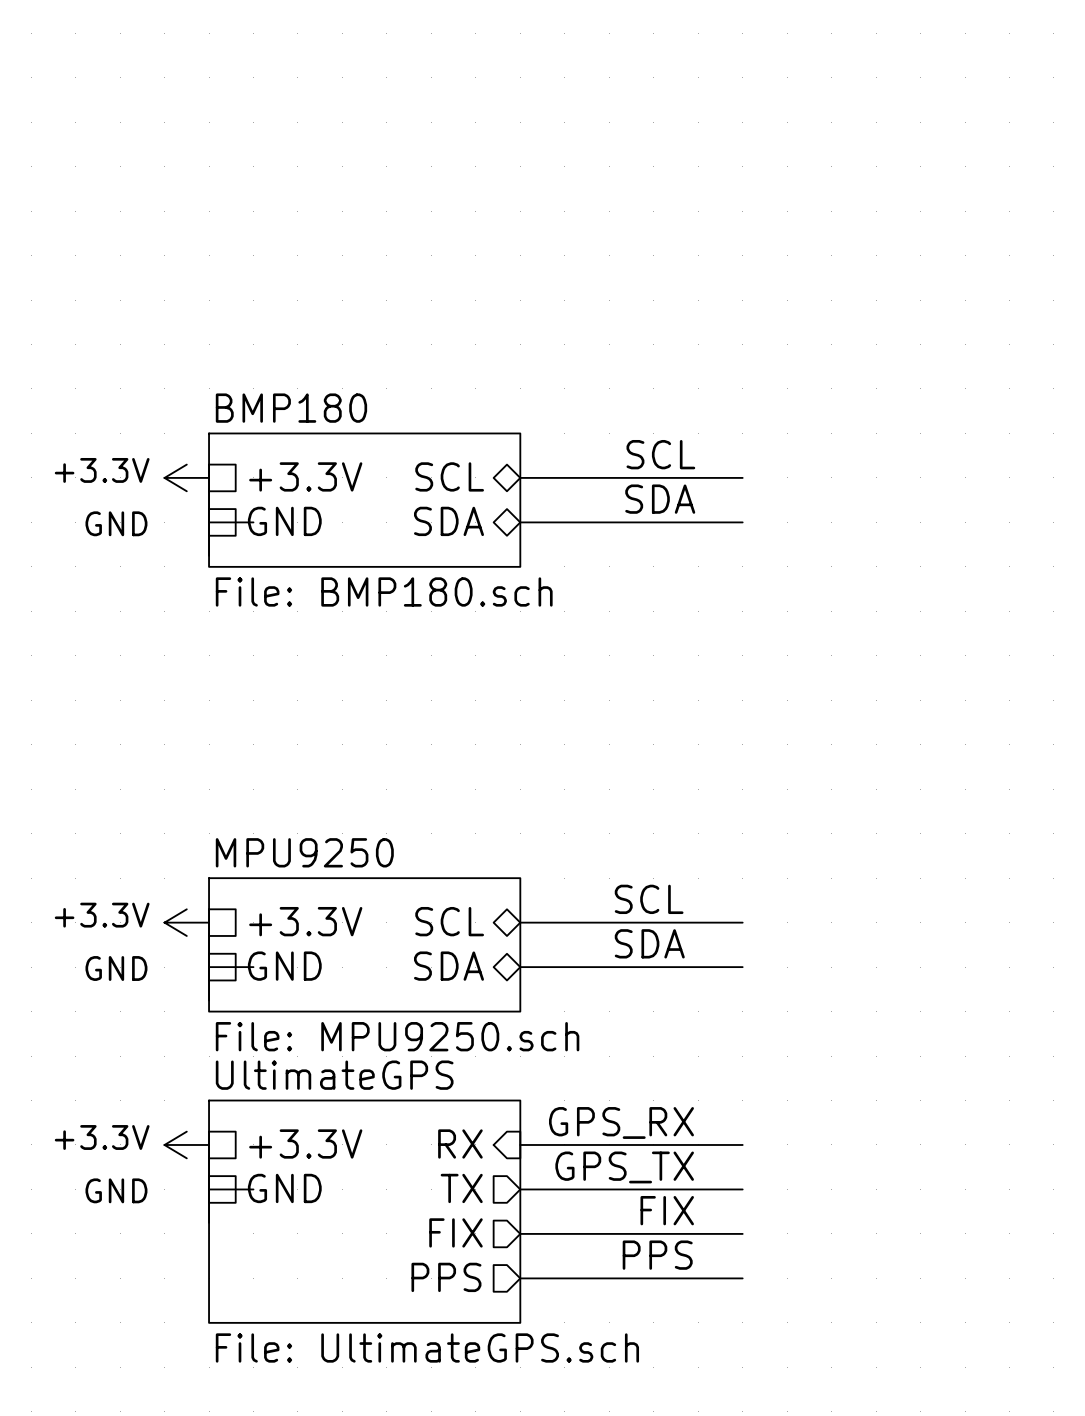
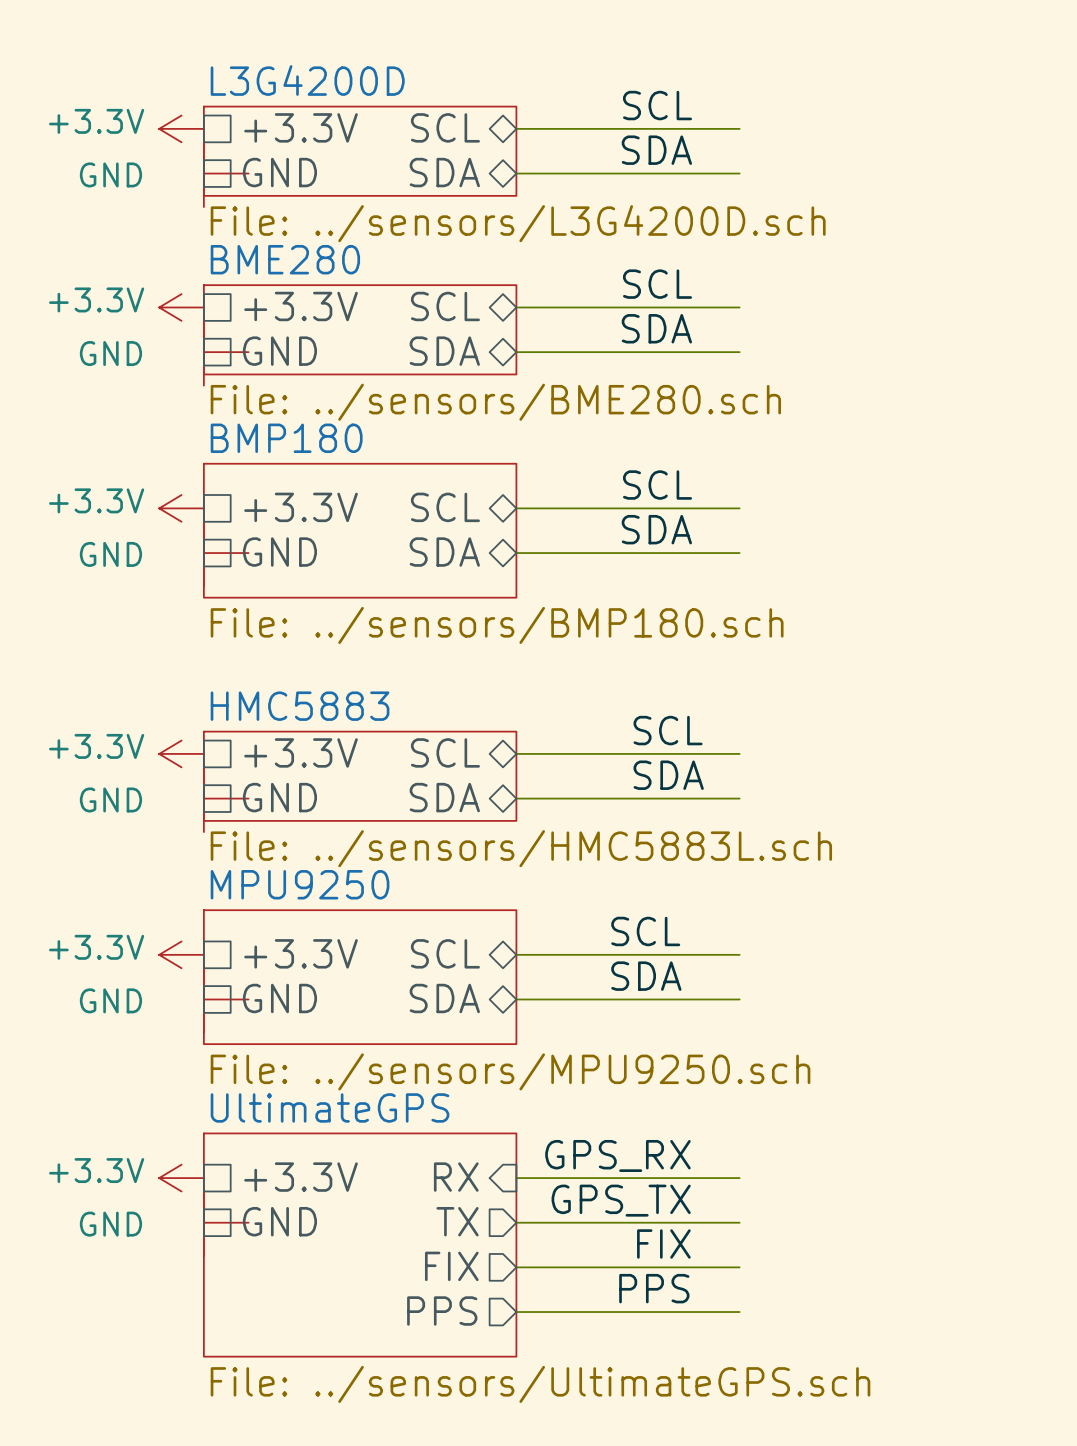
label: none -> SCL (657, 105)
sheet pin: none -> +3.3V (301, 127)
sheet pin: none -> SCL (445, 127)
power symbol: none -> +3.3V (181, 128)
wire: none -> (516, 128) (739, 128)
label: none -> SDA (656, 150)
sheet L3G4200D: none -> File: ../sensors/L3G4200D.sch (360, 151)
sheet pin: none -> GND (279, 172)
sheet pin: none -> SDA (444, 172)
power symbol: none -> GND (226, 173)
wire: none -> (516, 173) (739, 173)
label: none -> SCL (657, 284)
sheet pin: none -> +3.3V (301, 306)
sheet pin: none -> SCL (445, 306)
power symbol: none -> +3.3V (181, 307)
wire: none -> (516, 307) (739, 307)
label: none -> SDA (656, 328)
sheet BME280: none -> File: ../sensors/BME280.sch (360, 329)
sheet pin: none -> GND (279, 351)
sheet pin: none -> SDA (444, 351)
power symbol: none -> GND (226, 352)
wire: none -> (516, 352) (739, 352)
sheet BMP180 value: File: BMP180.sch (384, 591) -> File: ../sensors/BMP180.sch (497, 625)
label: none -> SCL (668, 730)
sheet pin: none -> +3.3V (301, 752)
sheet pin: none -> SCL (445, 752)
power symbol: none -> +3.3V (181, 753)
wire: none -> (516, 753) (739, 753)
label: none -> SDA (668, 775)
sheet HMC5883: none -> File: ../sensors/HMC5883L.sch (360, 776)
sheet pin: none -> GND (279, 797)
sheet pin: none -> SDA (444, 797)
power symbol: none -> GND (226, 798)
wire: none -> (516, 798) (739, 798)
sheet MPU9250 value: File: MPU9250.sch (397, 1036) -> File: ../sensors/MPU9250.sch (510, 1071)
sheet UltimateGPS value: File: UltimateGPS.sch (427, 1347) -> File: ../sensors/UltimateGPS.sch (540, 1384)

